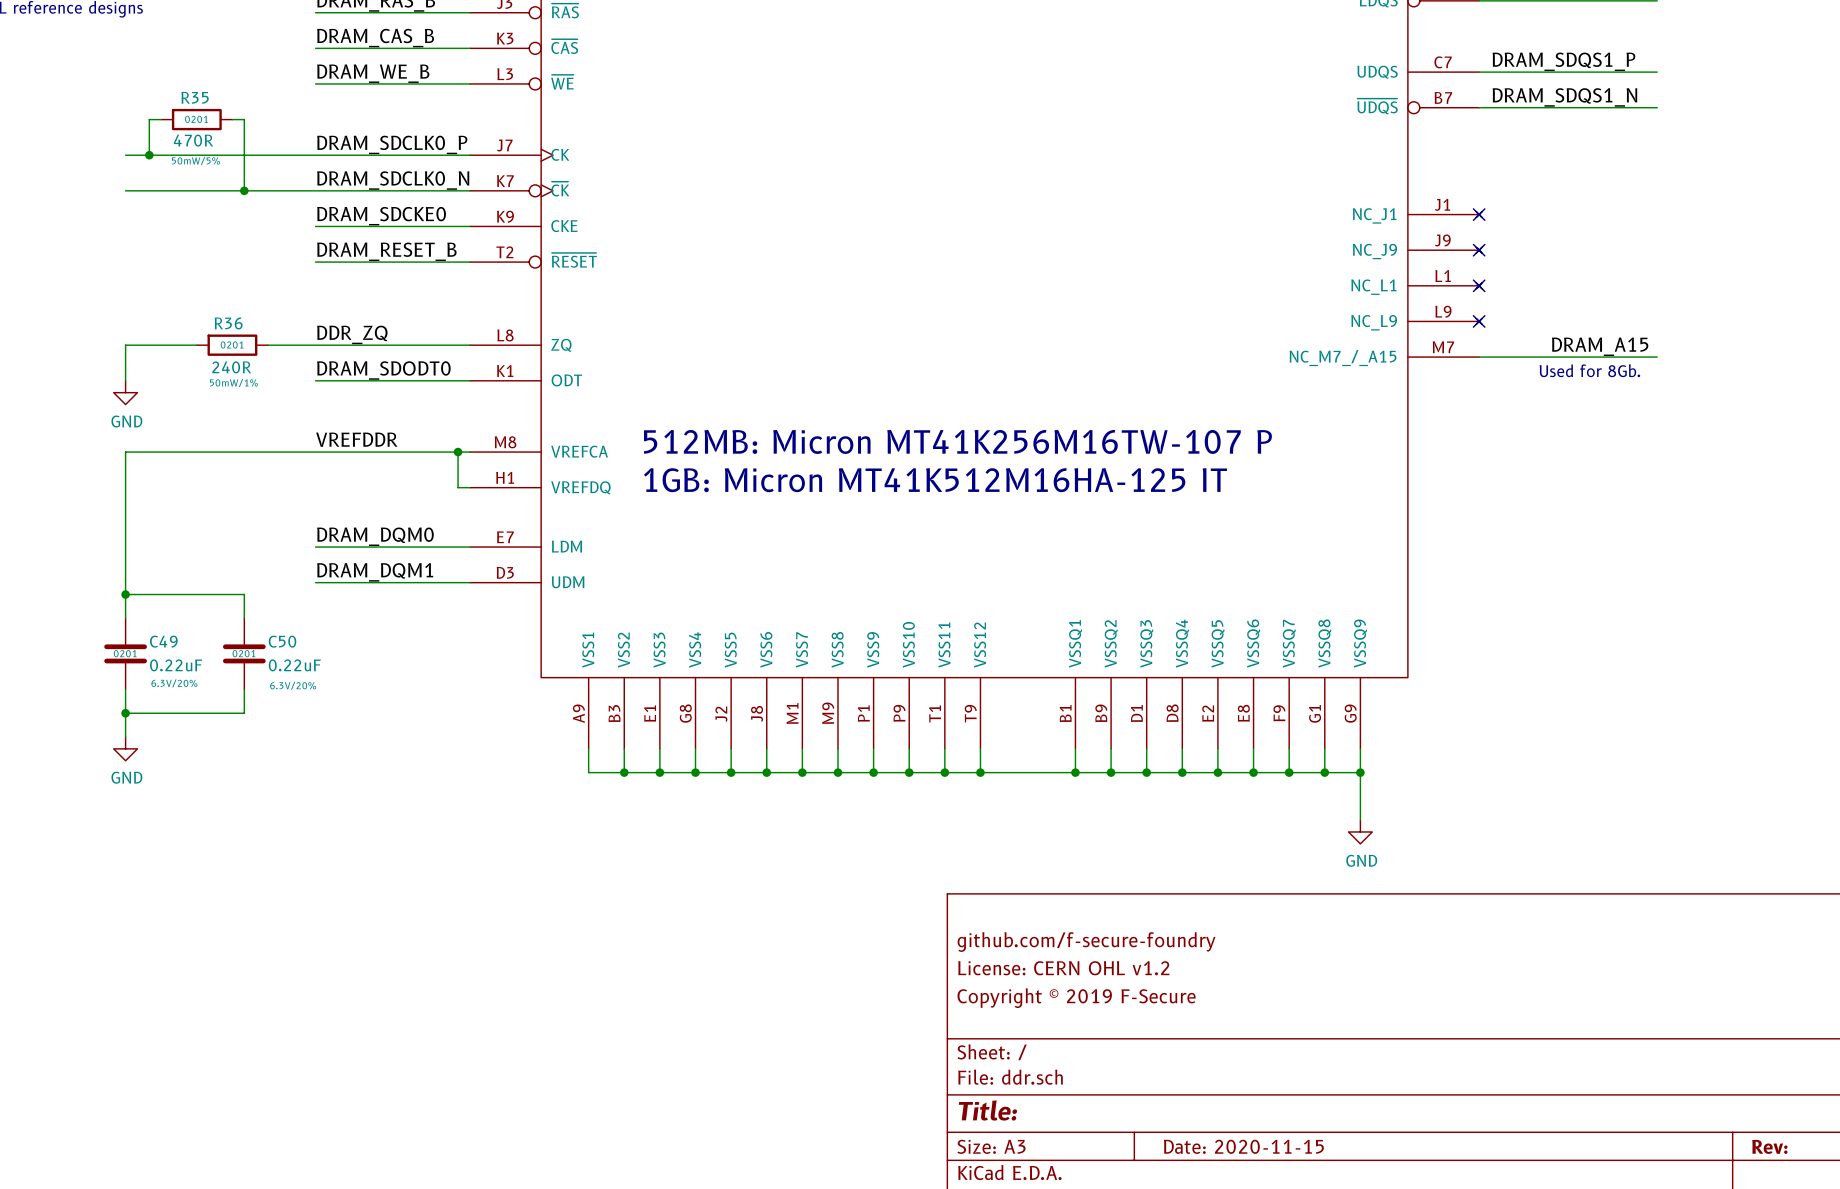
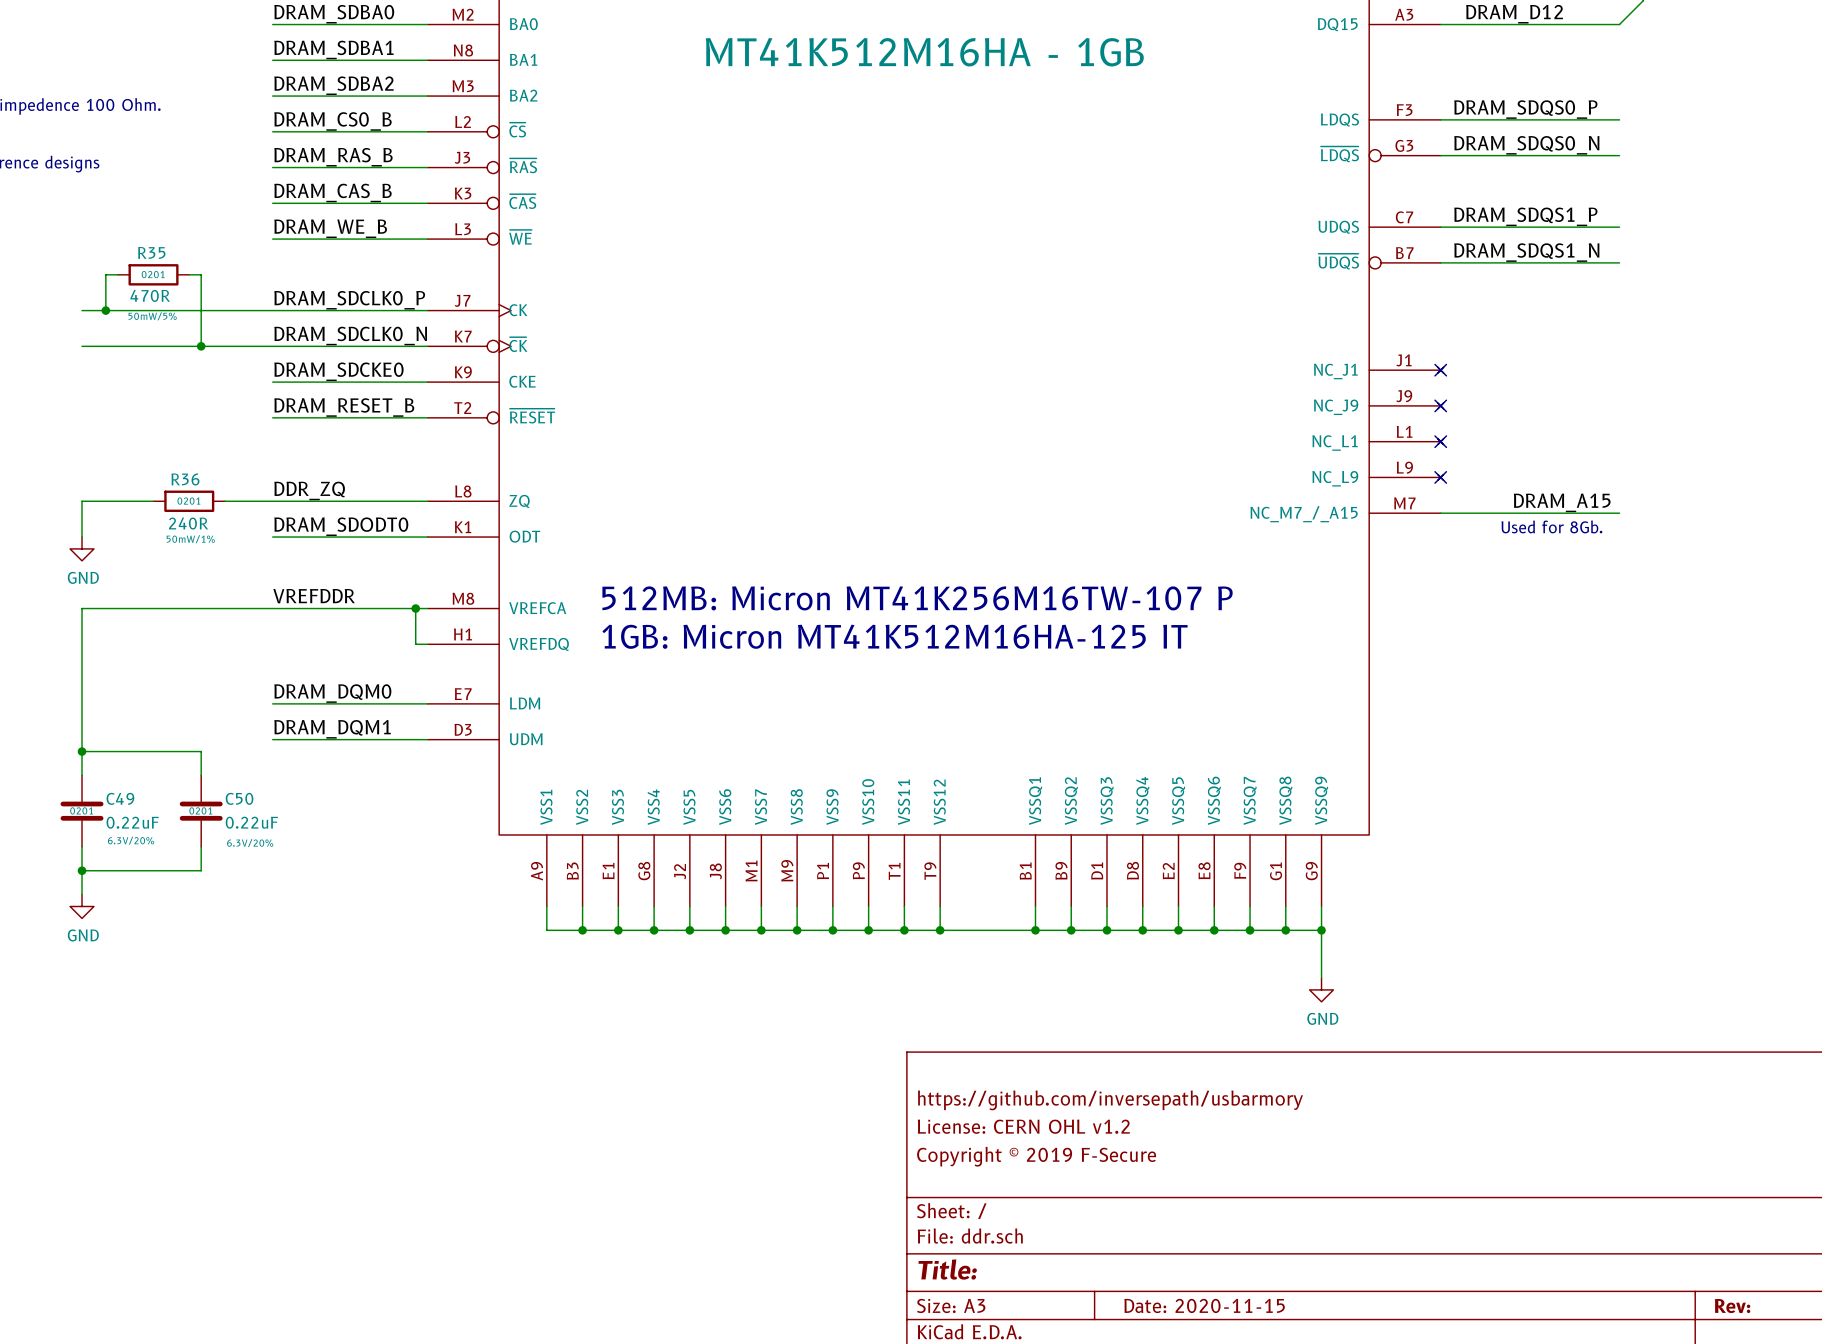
title block: github.com/f-secure-foundry (1086, 942) -> https://github.com/inversepath/usbarmory (1110, 1100)

